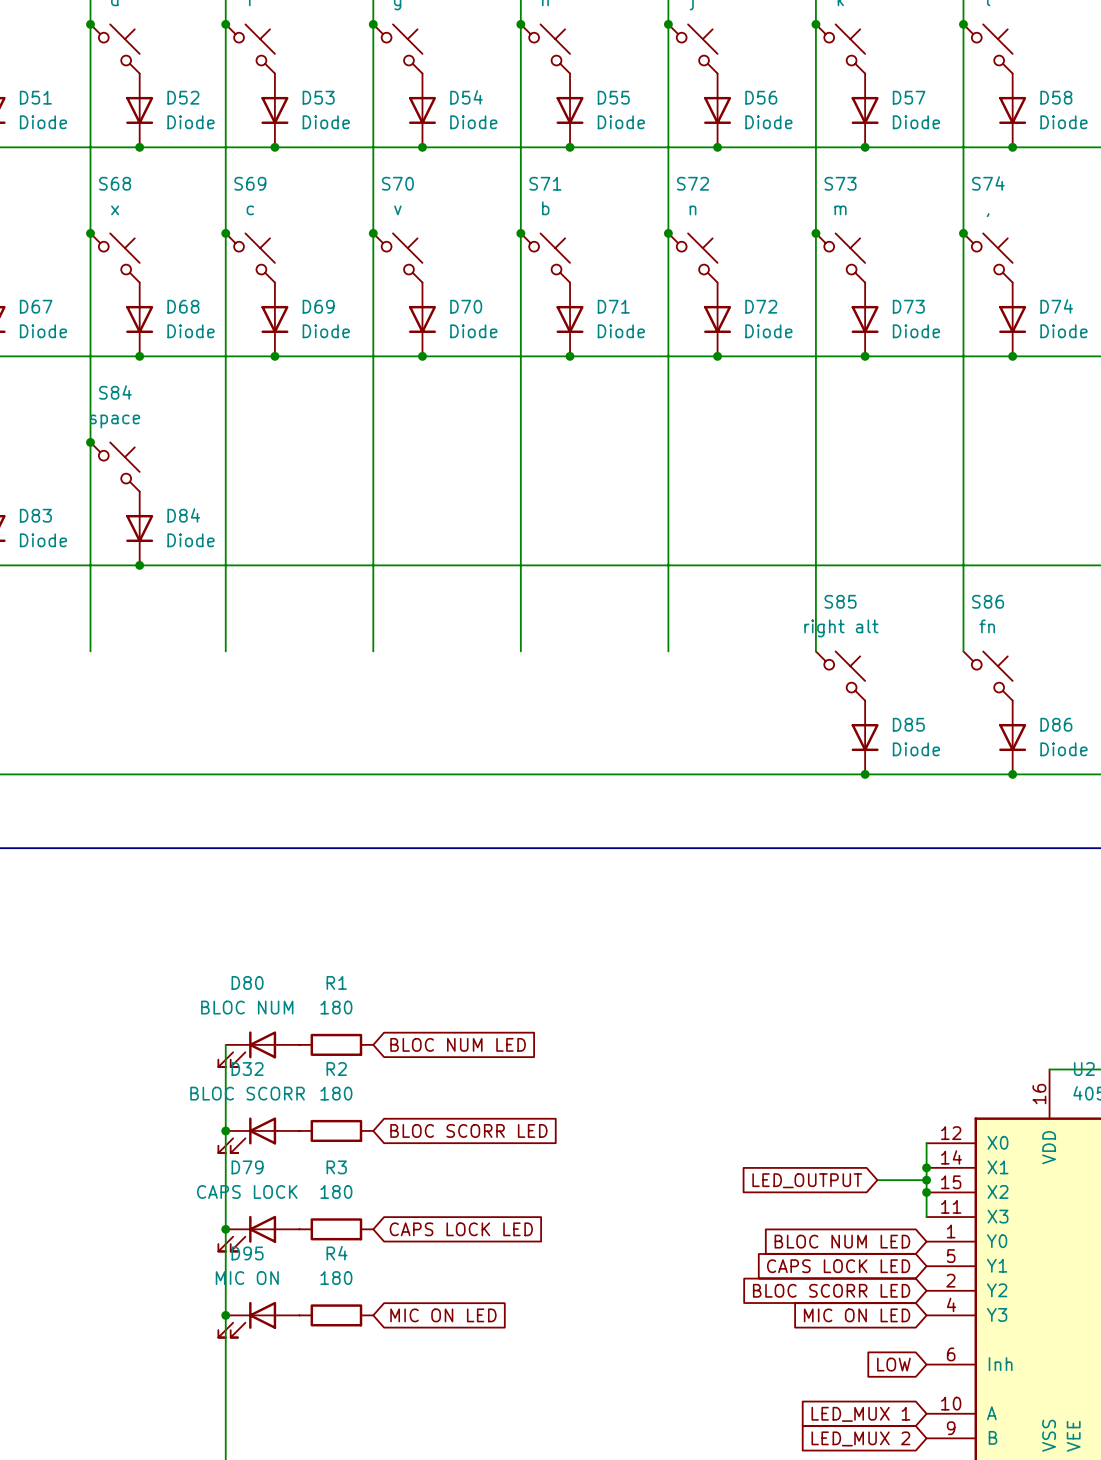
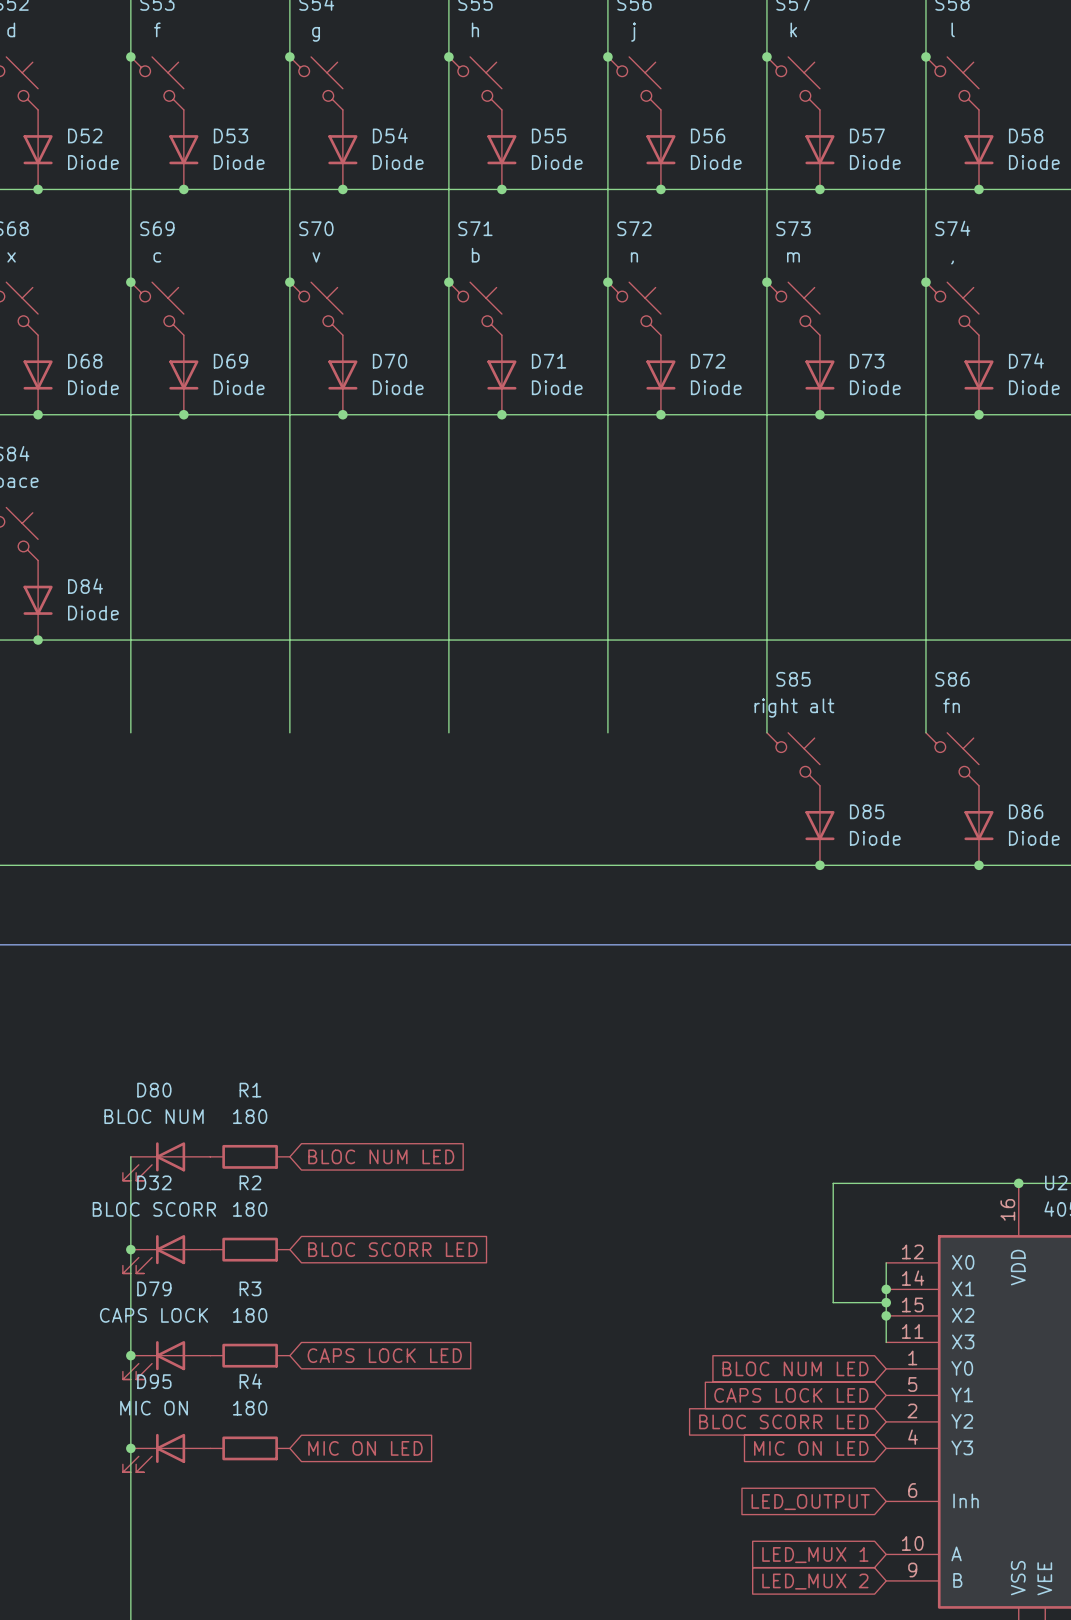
wire: none -> (1018, 1183) (833, 1183) (833, 1302)
junction: none -> (1018, 1183)
global label: LED_OUTPUT (807, 1180) -> none
global label: LOW (893, 1364) -> LED_OUTPUT (810, 1502)

